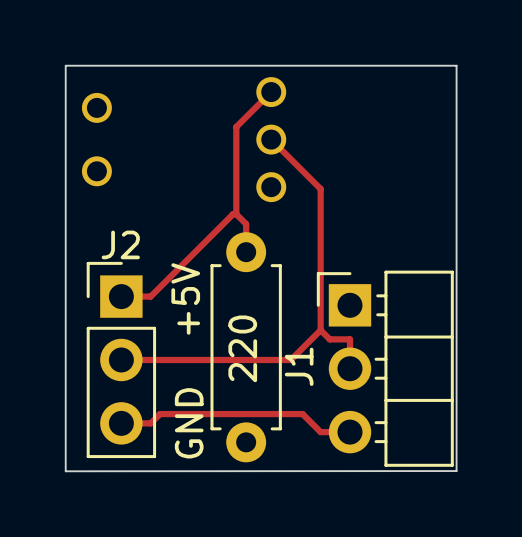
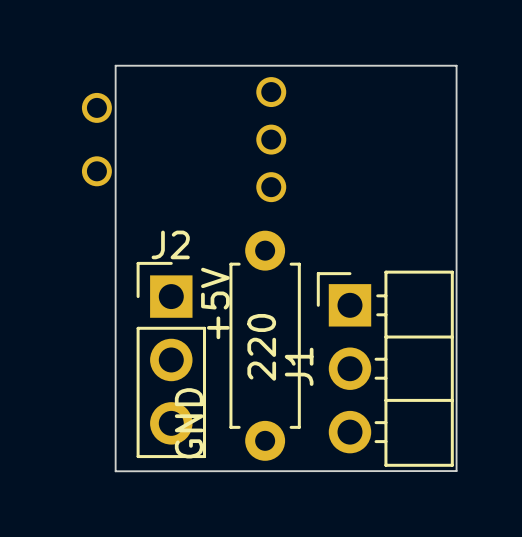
board edge: (115, 65) (65, 65) (65, 471) (456, 471) -> (115, 65) (115, 471) (456, 471)
track: (271, 92) (236, 126) (236, 214) -> none
track: (271, 139) (320, 189) (320, 330) -> none
track: (236, 214) (246, 224) (246, 252) -> none
track: (236, 214) (233, 214) (150, 296) (121, 296) -> none
text position: +5V (185, 298) -> +5V (215, 303)
track: (320, 330) (329, 339) (349, 339) (349, 368) -> none
track: (320, 330) (290, 359) (121, 359) -> none
part position: (246, 347) -> (265, 345)
J2 position: (121, 359) -> (171, 359)
track: (121, 423) (150, 423) (160, 414) (302, 414) (320, 432) (349, 432) -> none

